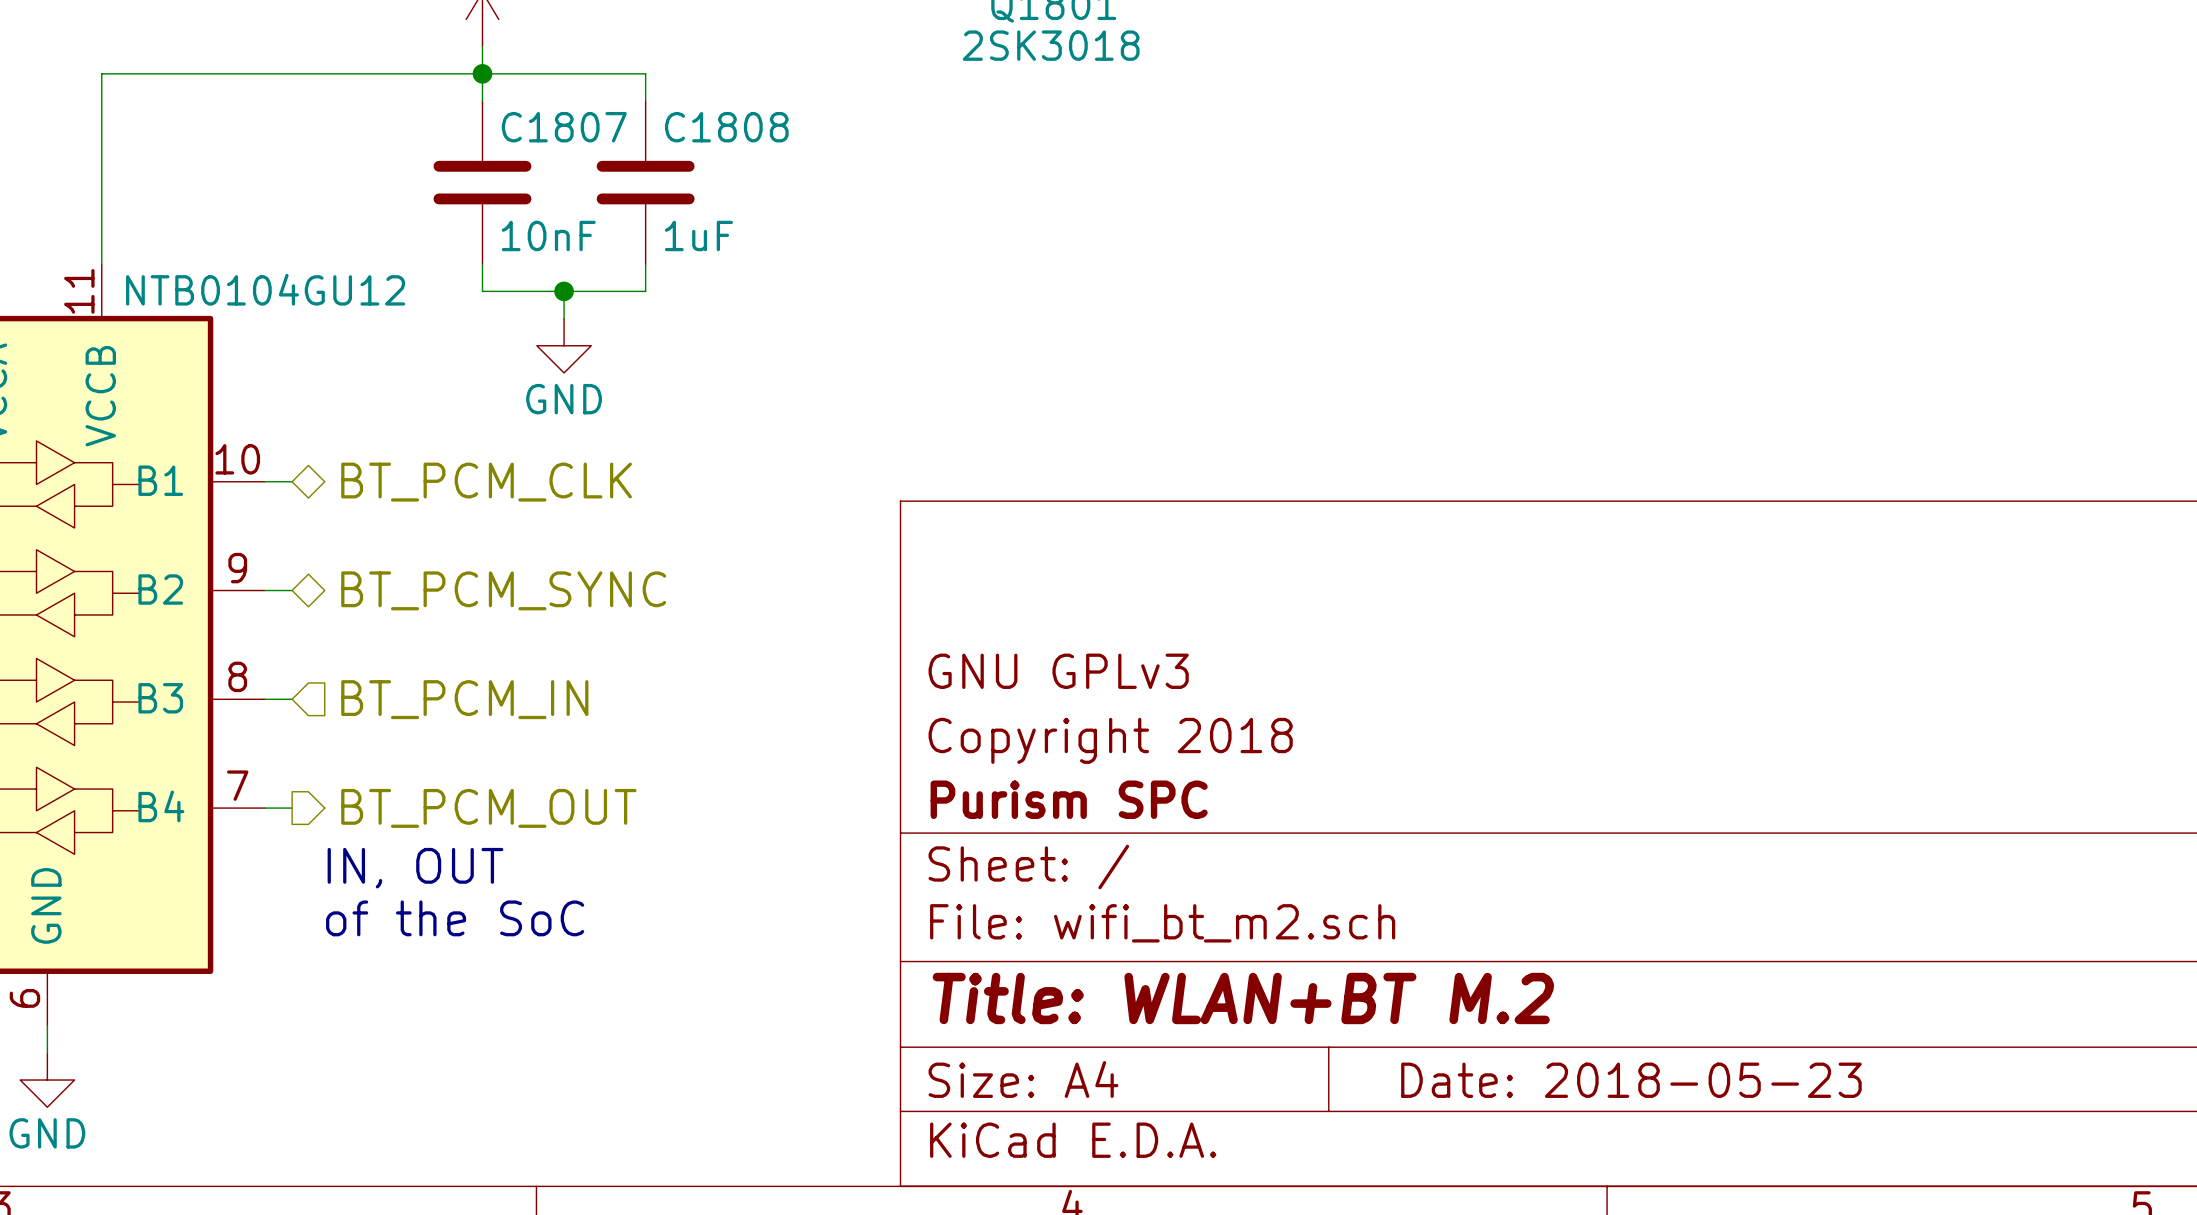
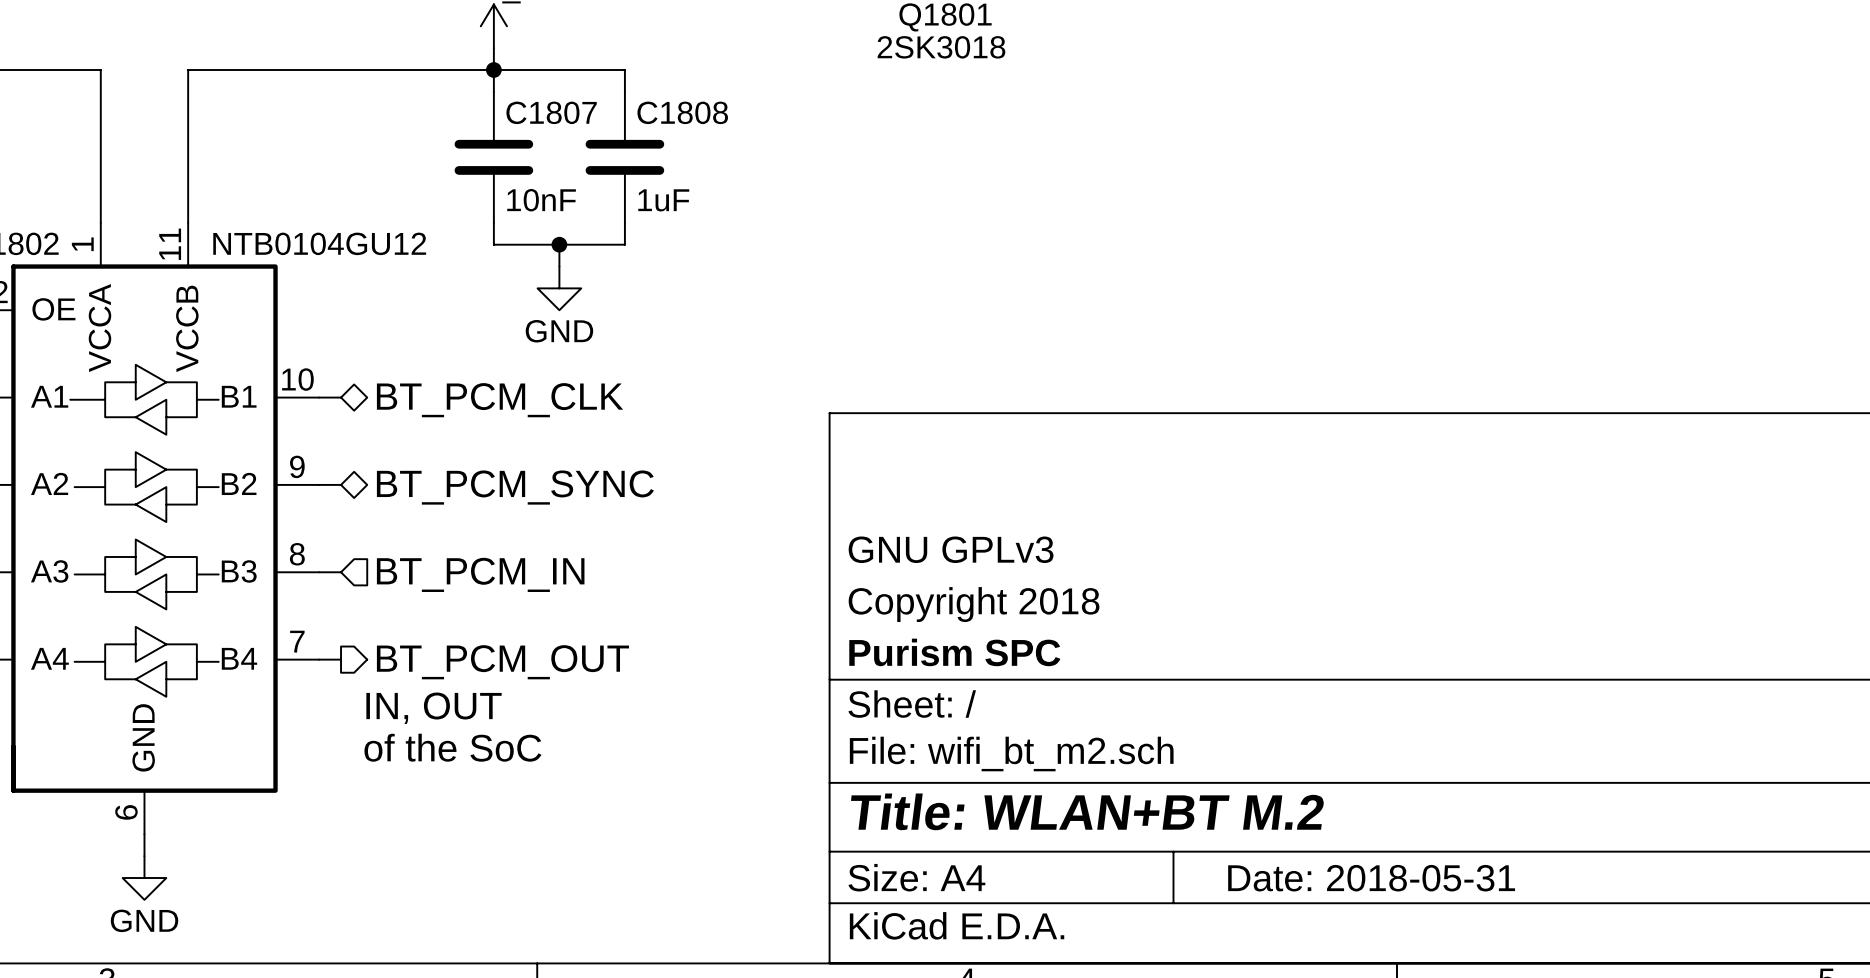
title block: Date: 2018-05-23 (1631, 1080) -> Date: 2018-05-31 (1371, 878)

